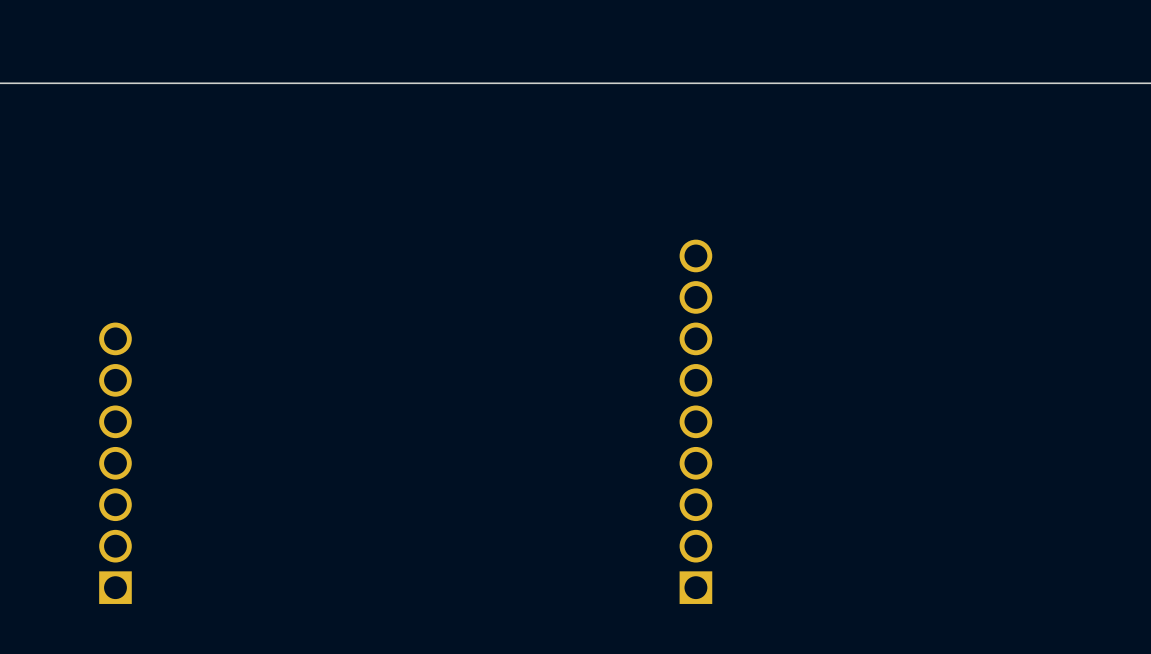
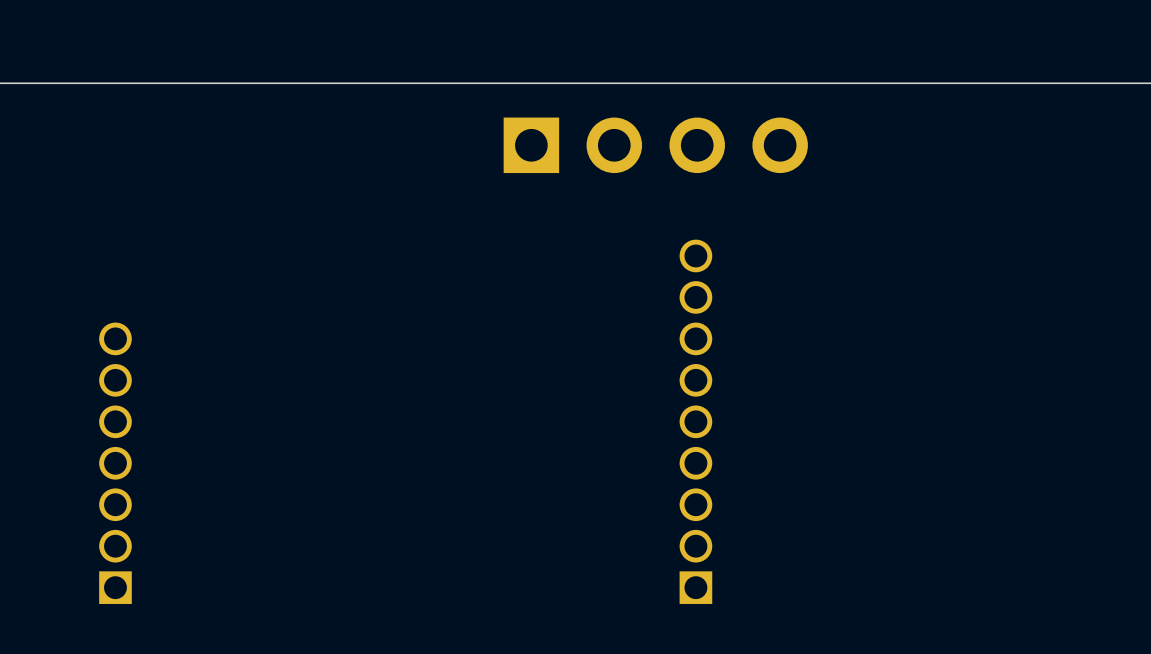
part: none -> (655, 145)

